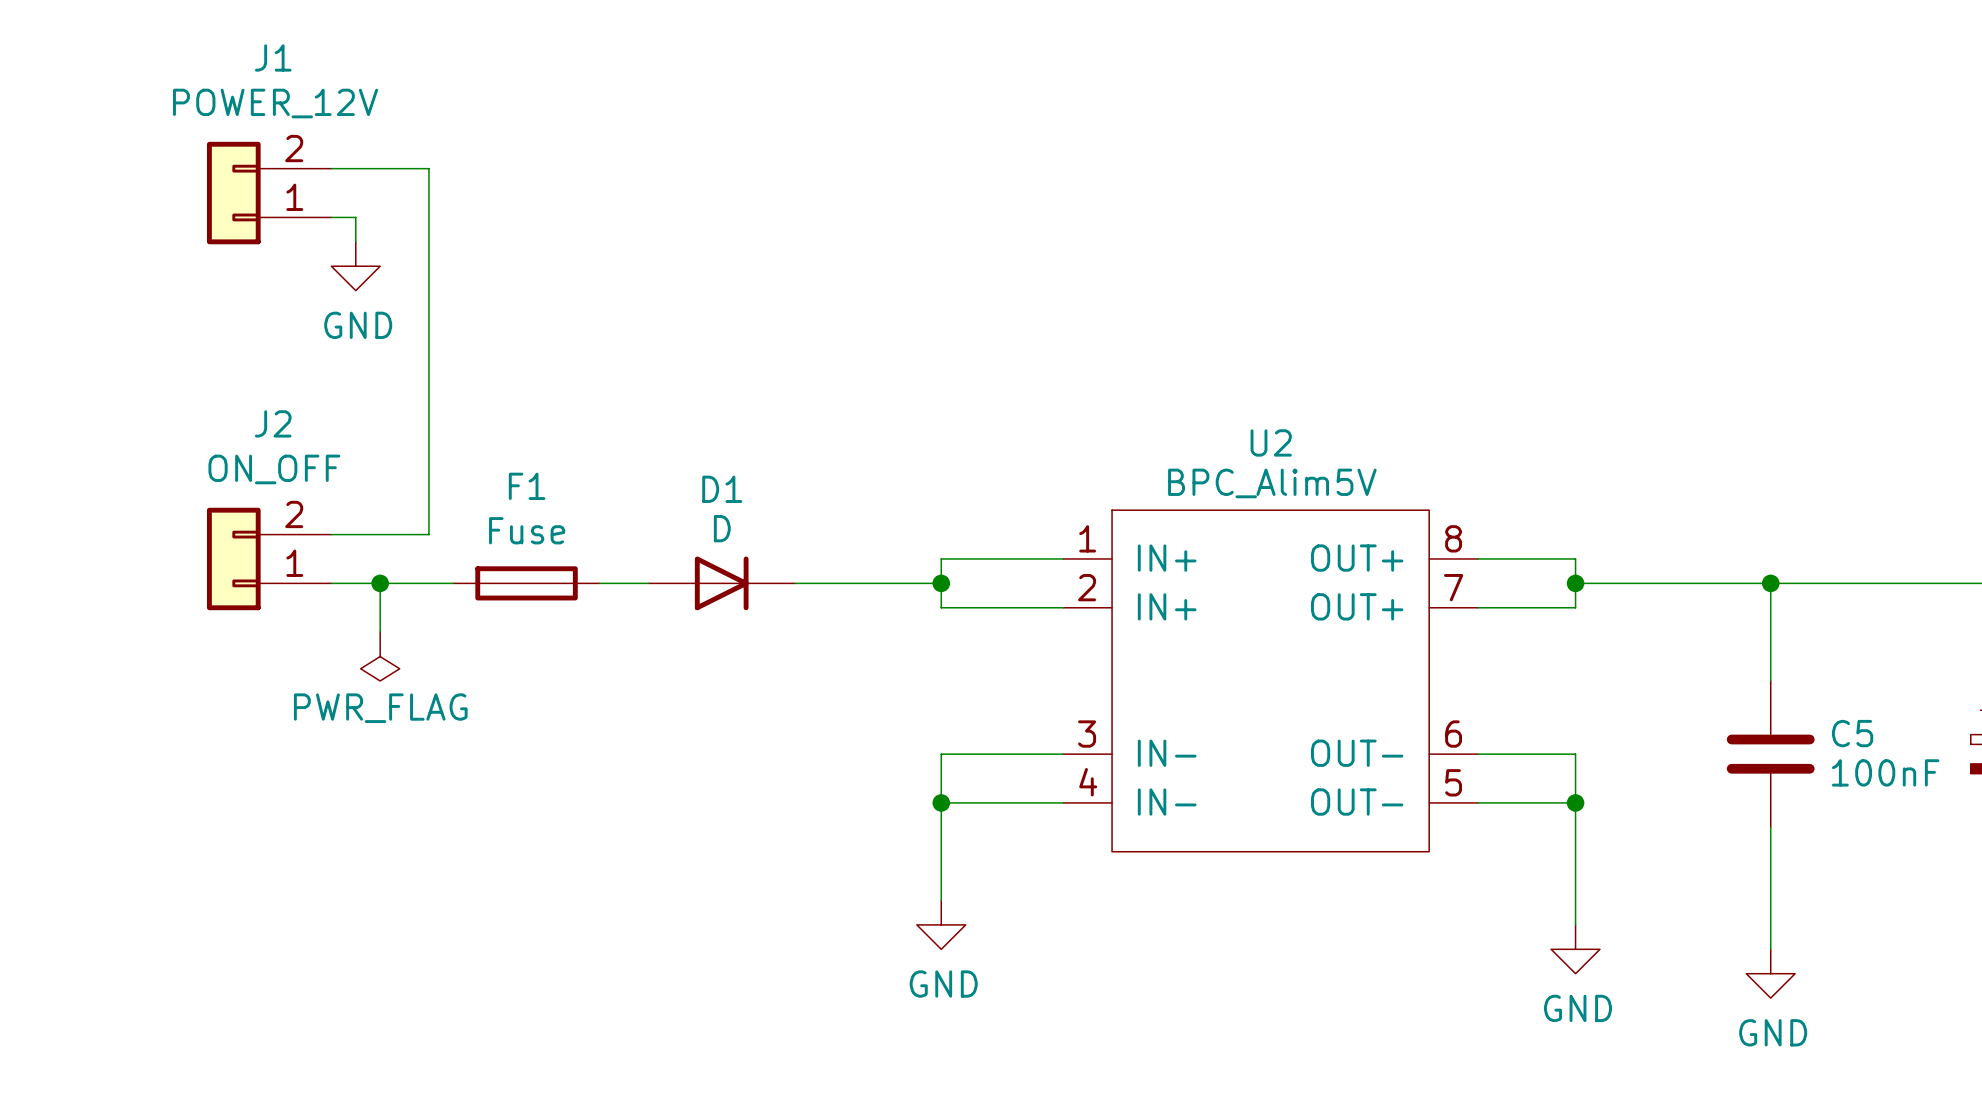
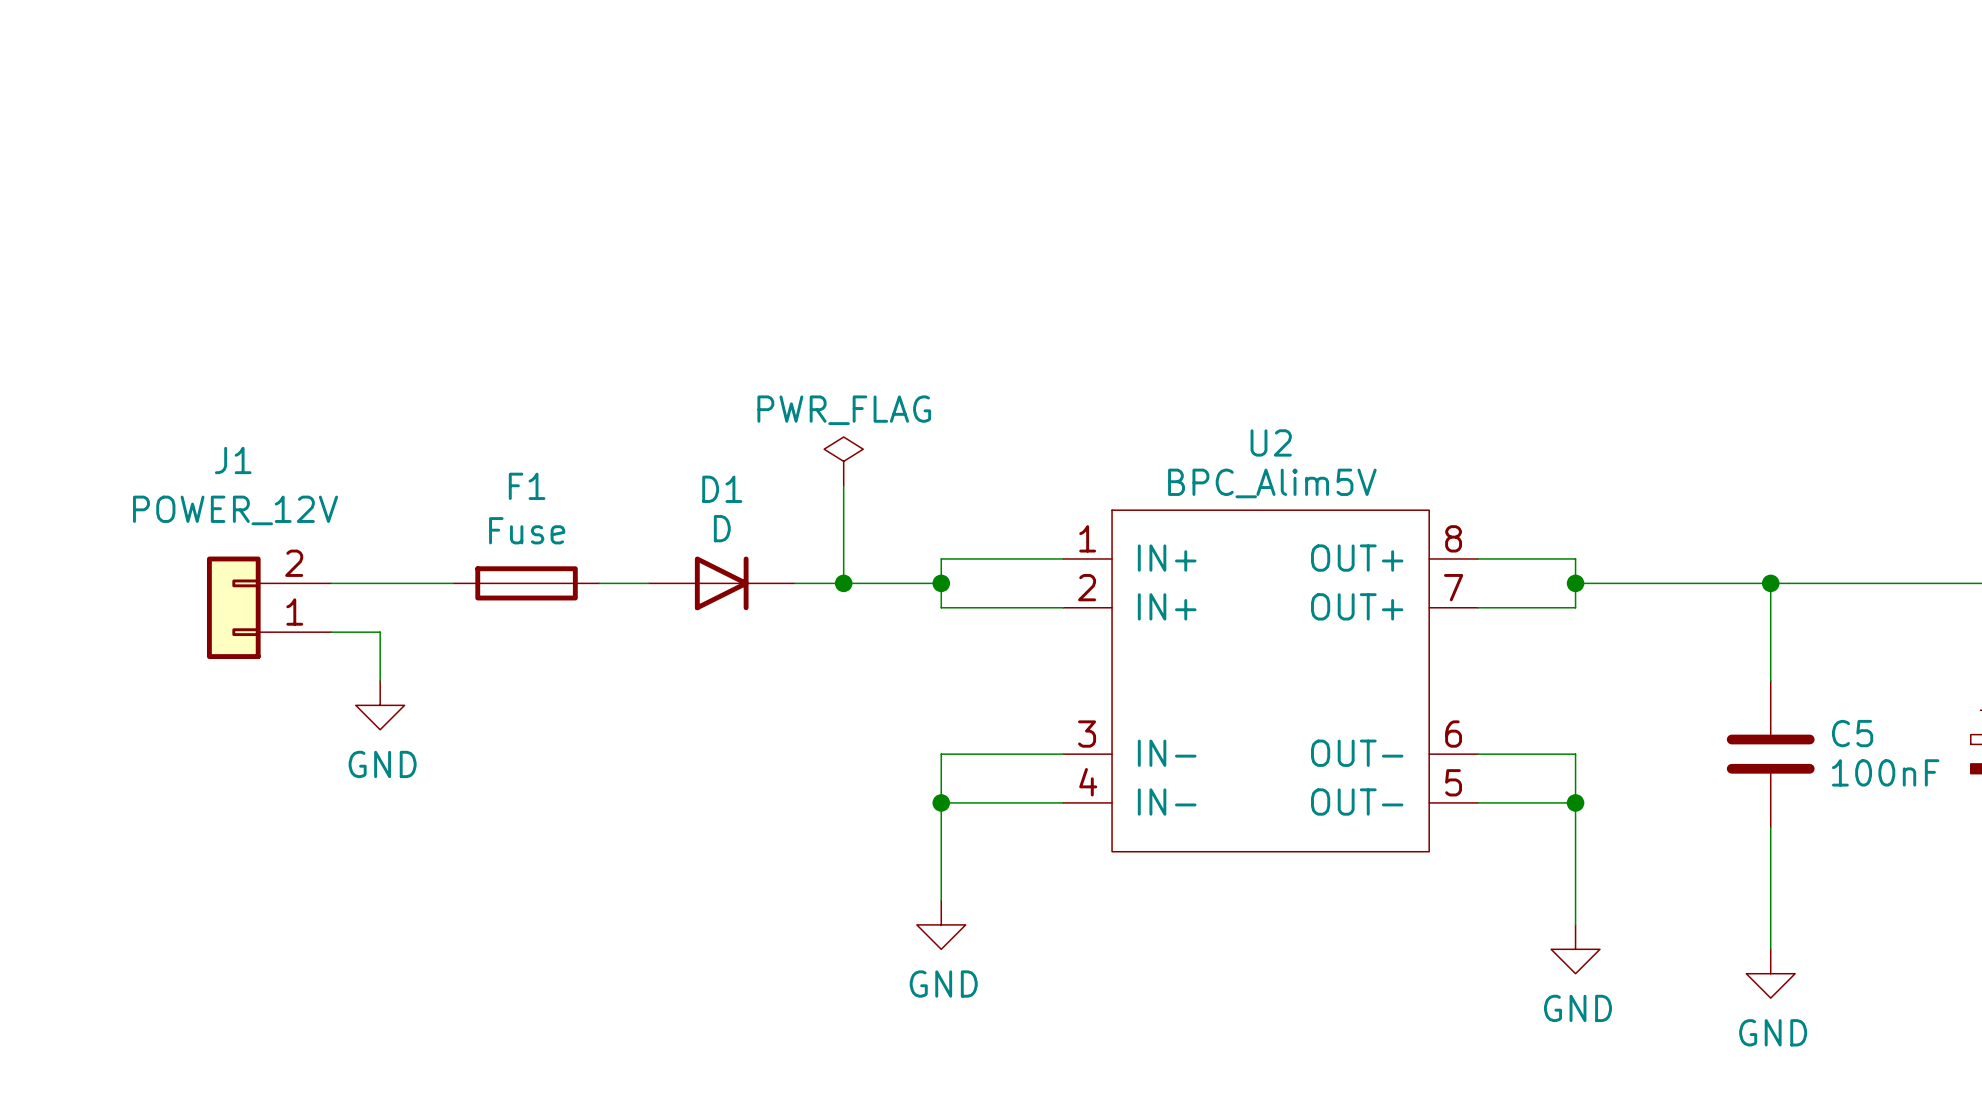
J1 name position: J1 (273, 57) -> J1 (233, 460)
J1 value position: POWER_12V (275, 103) -> POWER_12V (235, 510)
wire: (331, 168) (428, 168) (428, 534) (331, 534) -> none
J1 position: (269, 193) -> (269, 607)
wire: (331, 217) (355, 217) (355, 241) -> none
power symbol position: GND (355, 266) -> GND (380, 705)
power symbol: none -> PWR_FLAG (843, 461)
wire: none -> (843, 485) (843, 583)
J2: ON_OFF (269, 558) -> none
wire: (380, 583) (380, 632) -> none
junction: (380, 583) -> none
junction: none -> (843, 583)
wire: none -> (331, 632) (380, 632) (380, 680)
power symbol: PWR_FLAG (380, 656) -> none

